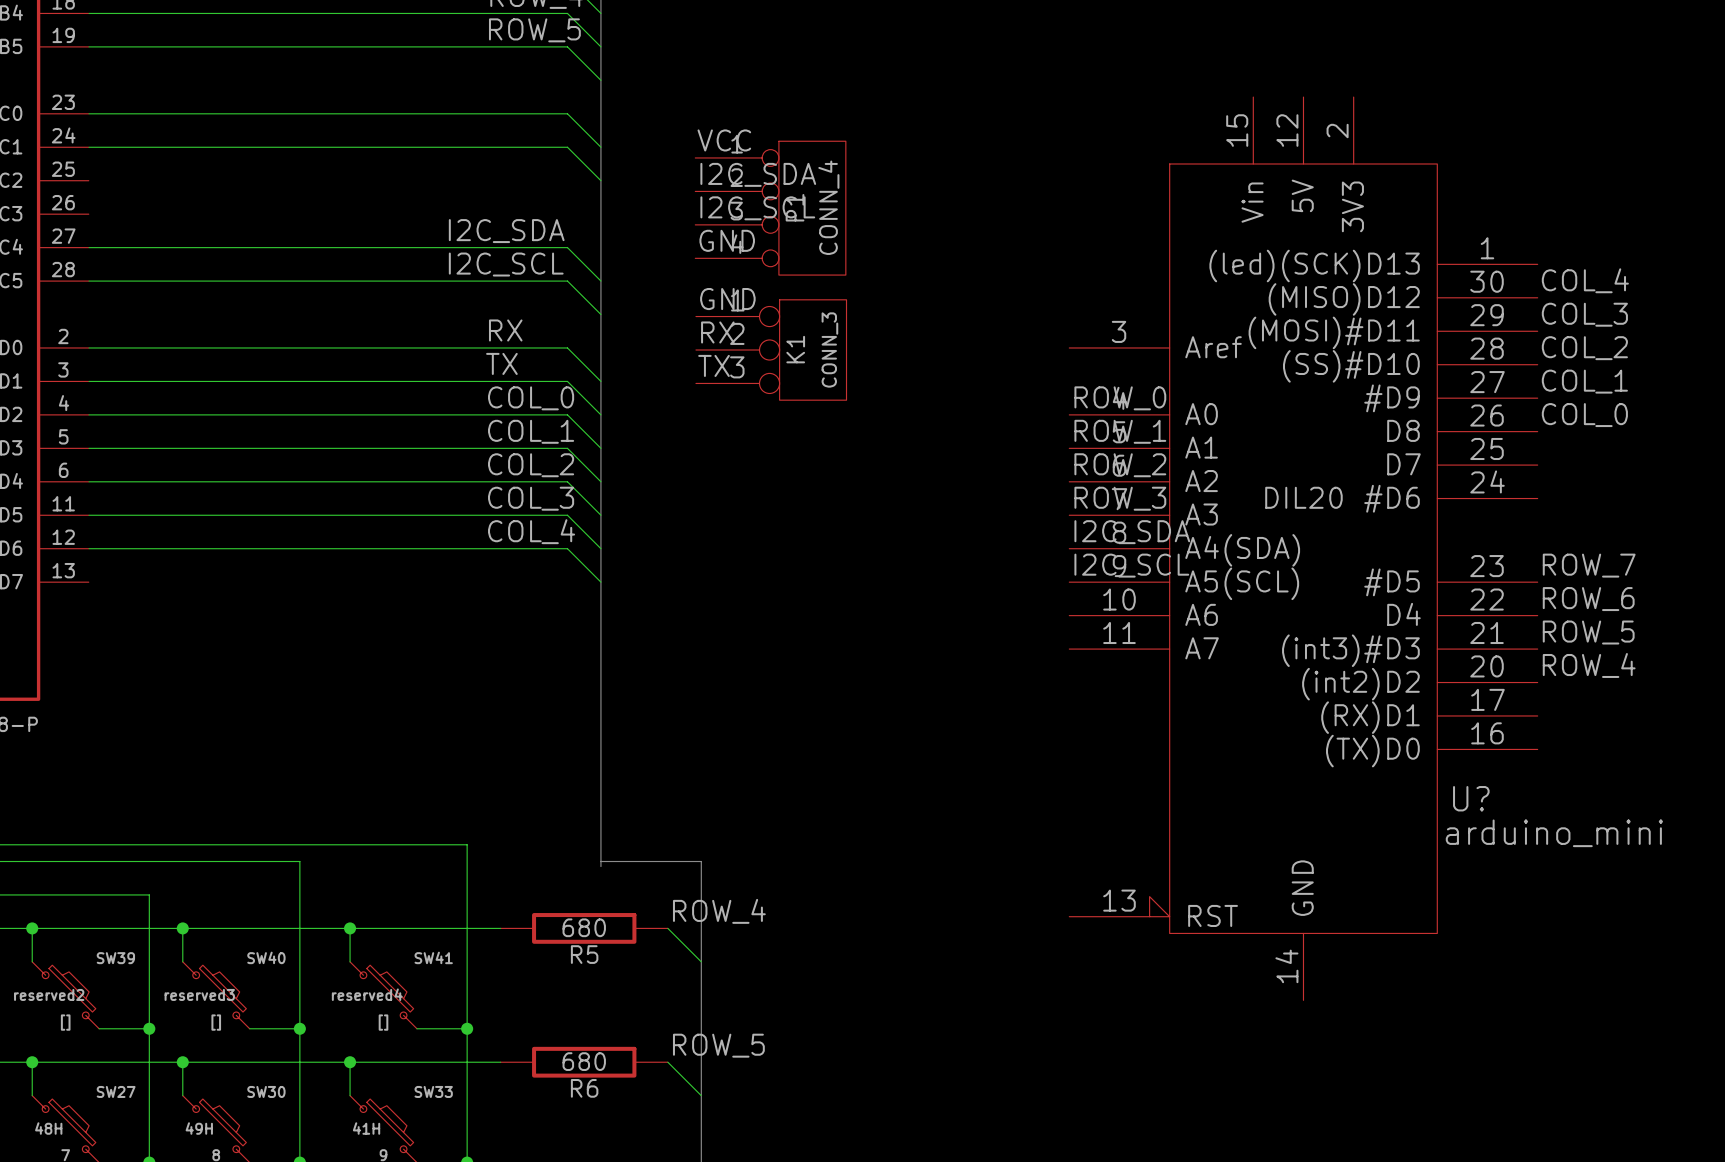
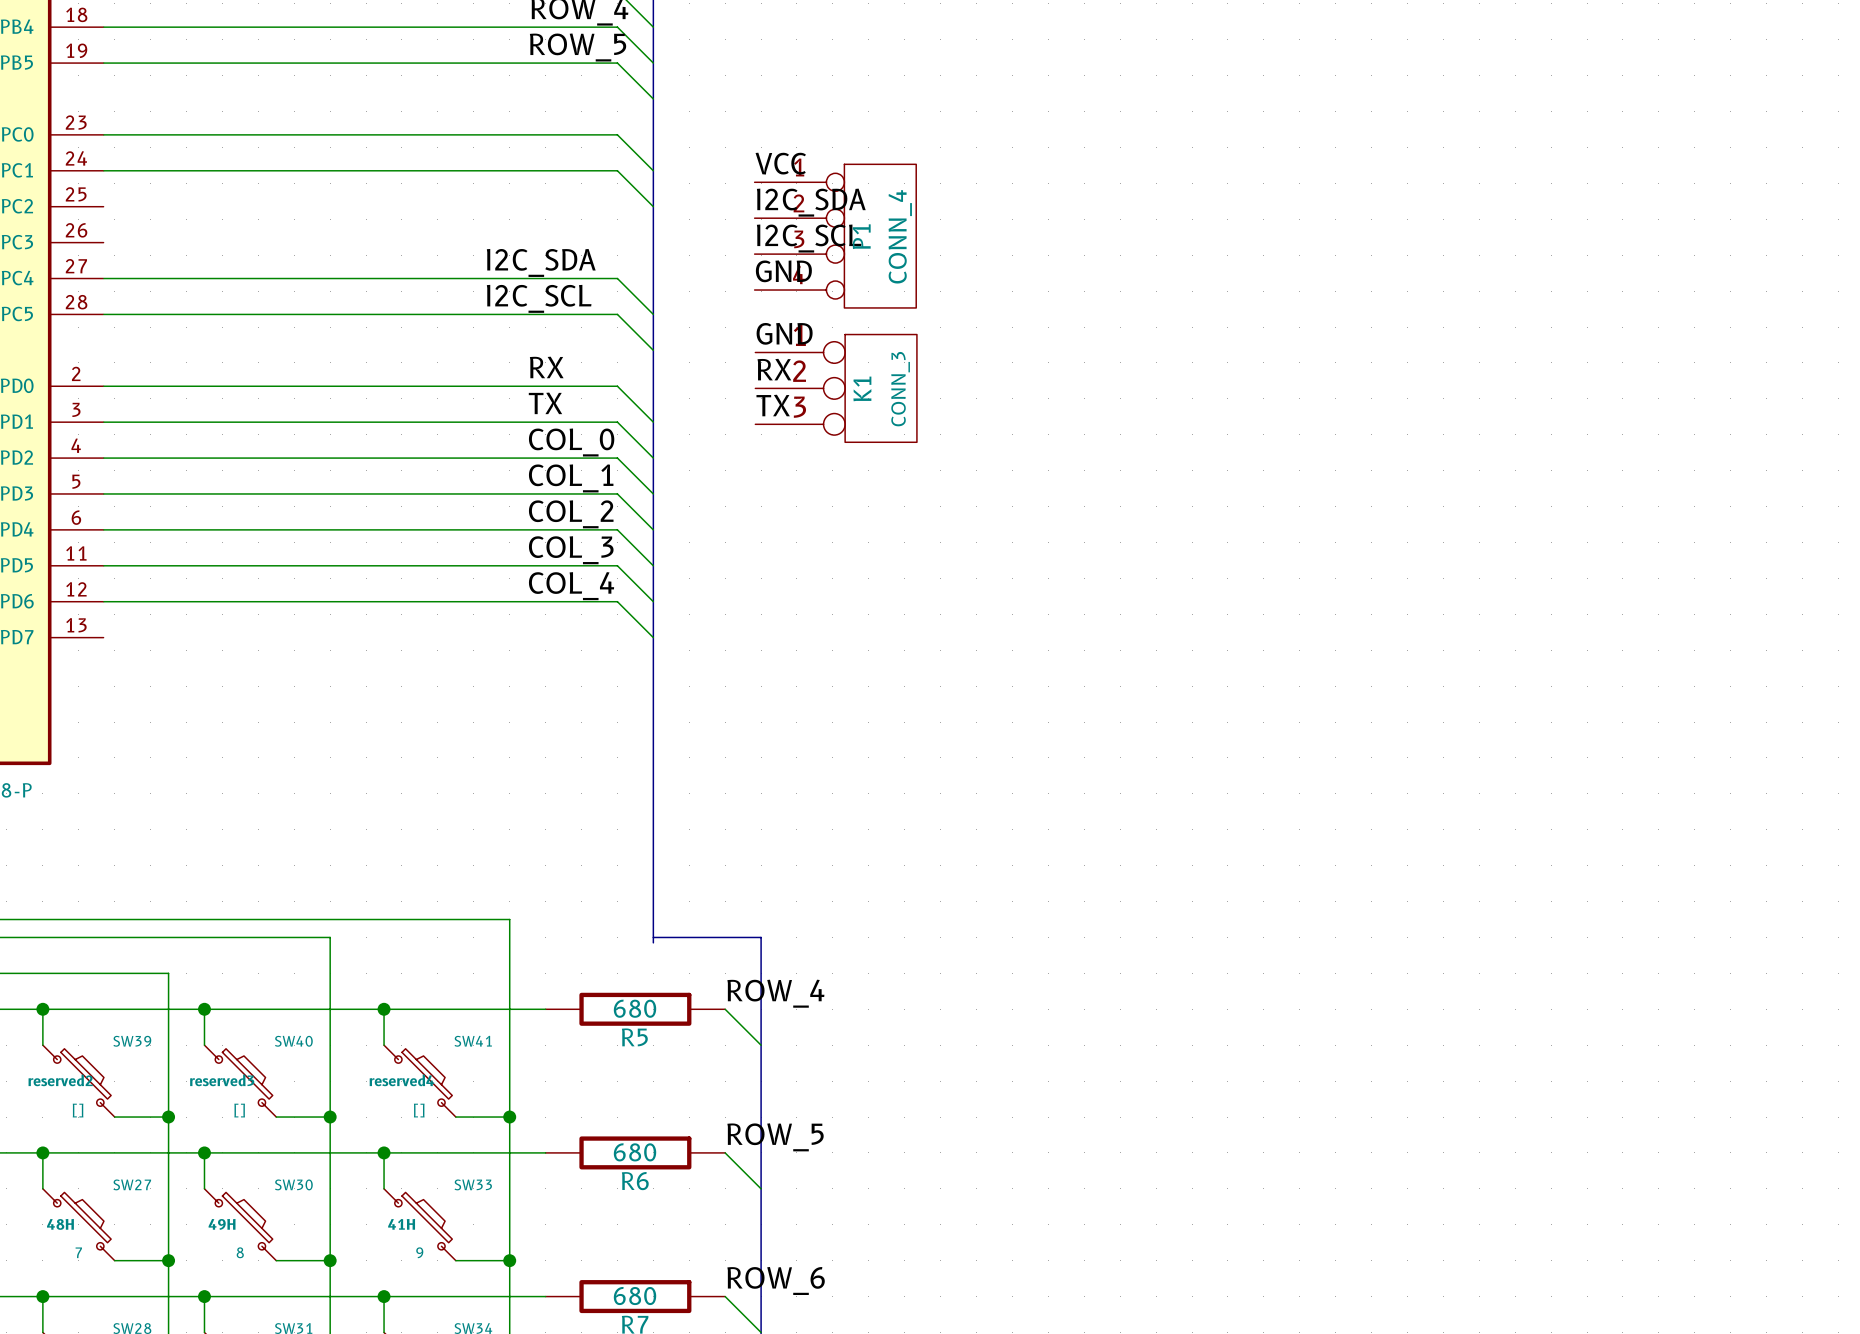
label: COL_4 (1585, 280) -> none
label: COL_3 (1584, 314) -> none
label: COL_2 (1584, 348) -> none
label: COL_1 (1584, 381) -> none
label: ROW_0 (1120, 398) -> none
label: COL_0 (1584, 415) -> none
label: ROW_1 (1120, 431) -> none
label: ROW_2 (1120, 465) -> none
label: ROW_3 (1120, 498) -> none
label: I2C_SDA (1132, 532) -> none
U?: arduino_mini (1303, 548) -> none
label: I2C_SCL (1131, 565) -> none
label: ROW_7 (1589, 565) -> none
label: ROW_6 (1588, 599) -> none
label: ROW_5 (1588, 632) -> none
label: ROW_4 (1589, 665) -> none

